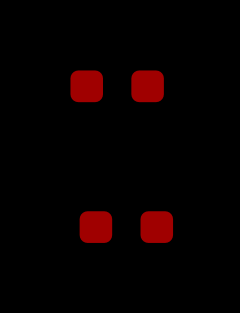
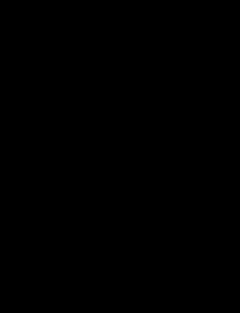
part: (117, 86) -> none
part: (126, 227) -> none

